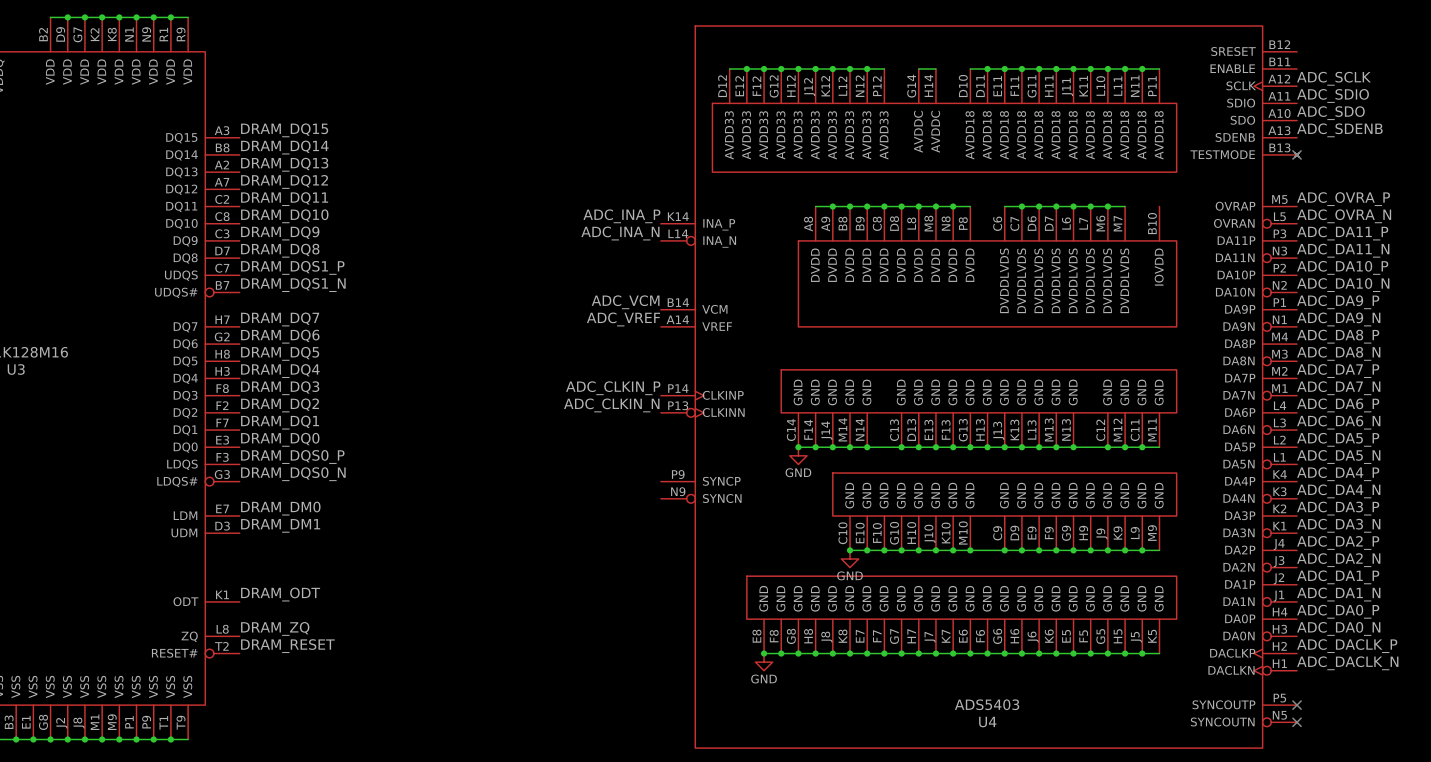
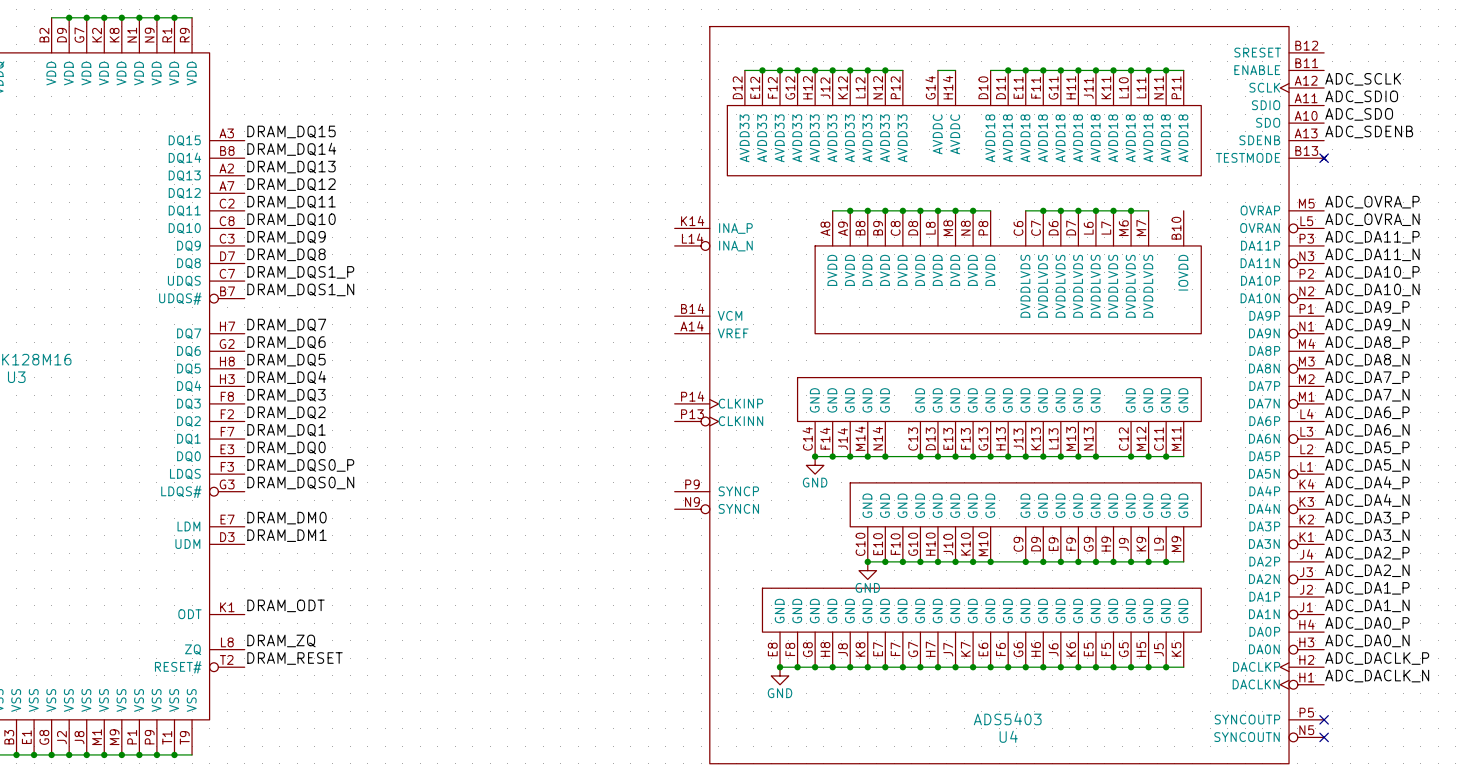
label: ADC_INA_P (621, 216) -> none
label: ADC_INA_N (620, 233) -> none
label: ADC_VCM (625, 302) -> none
label: ADC_VREF (623, 319) -> none
label: ADC_CLKIN_P (613, 388) -> none
label: ADC_CLKIN_N (611, 405) -> none

